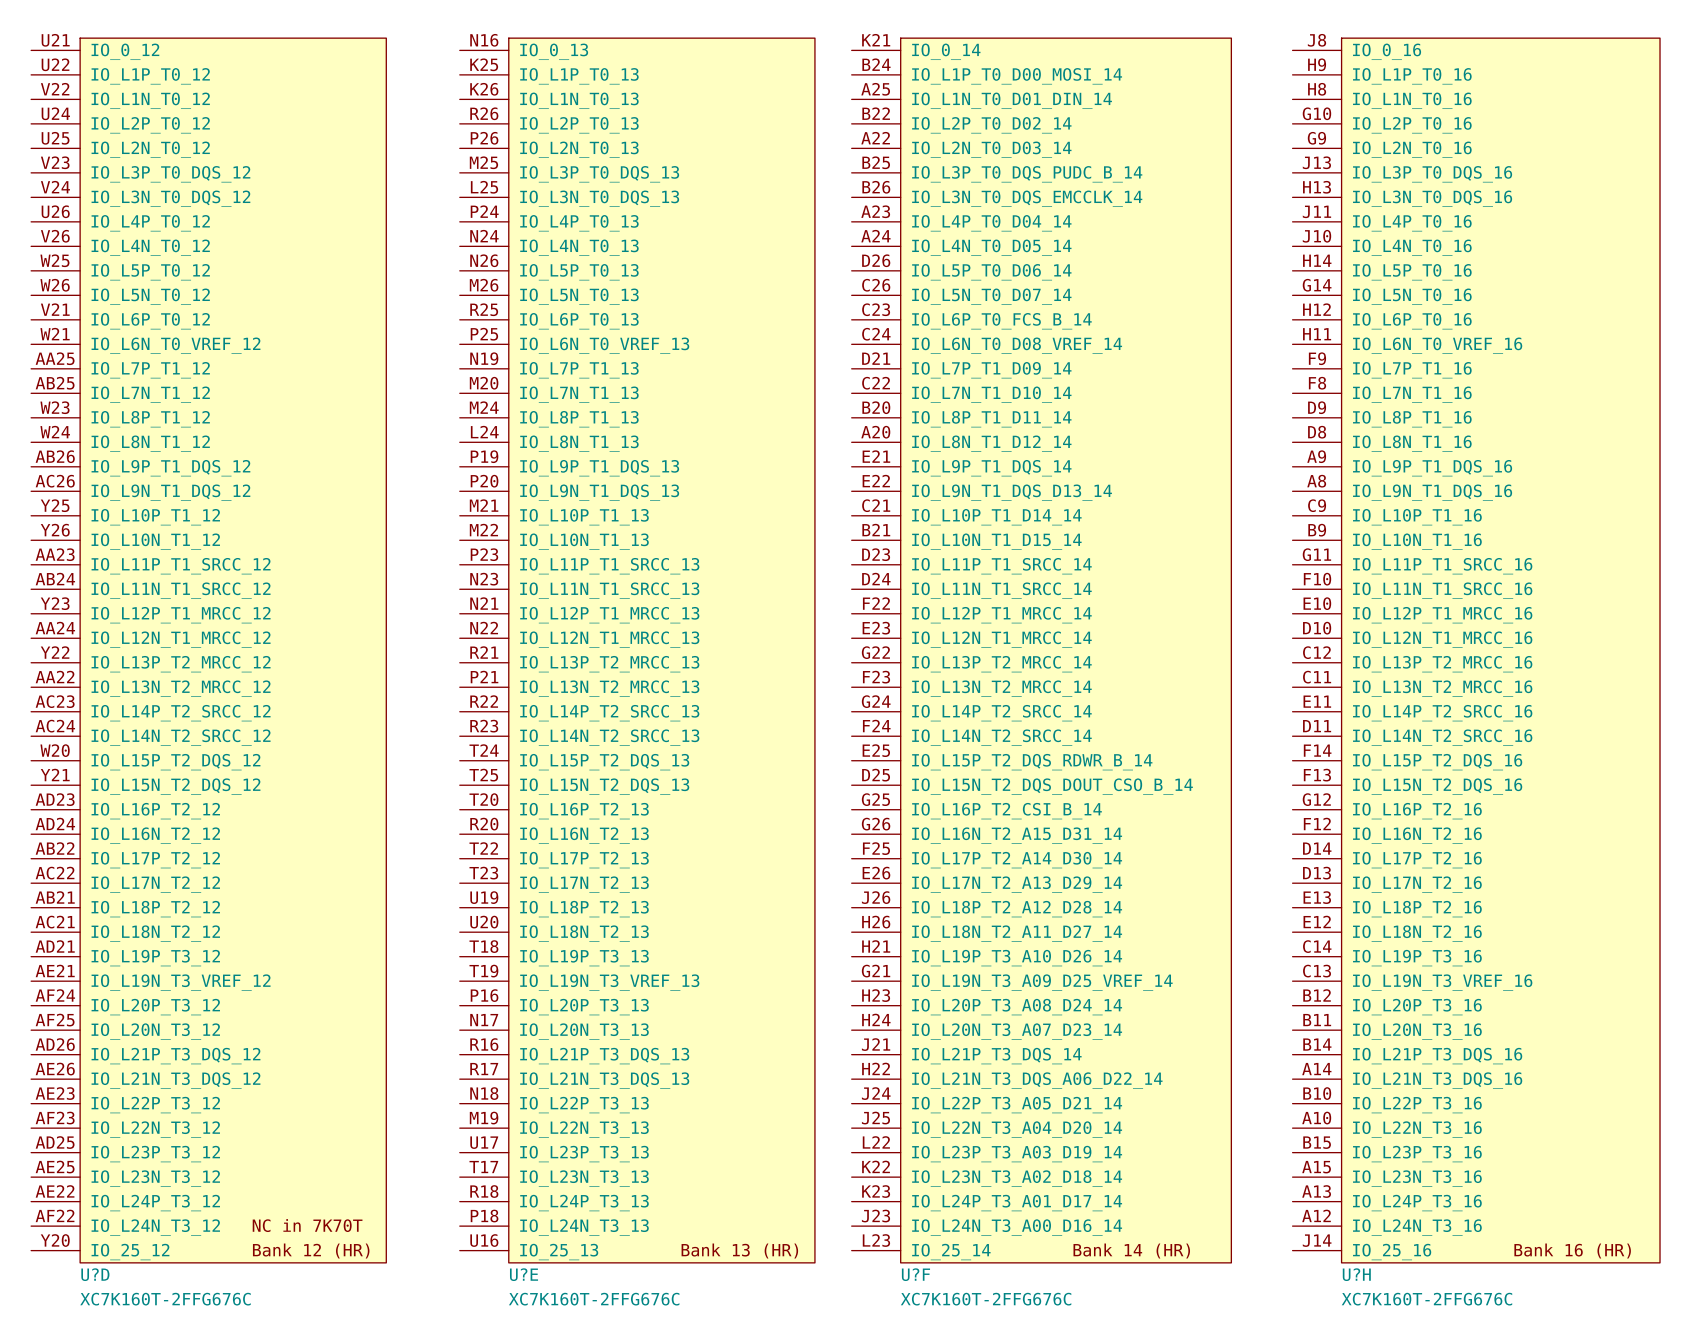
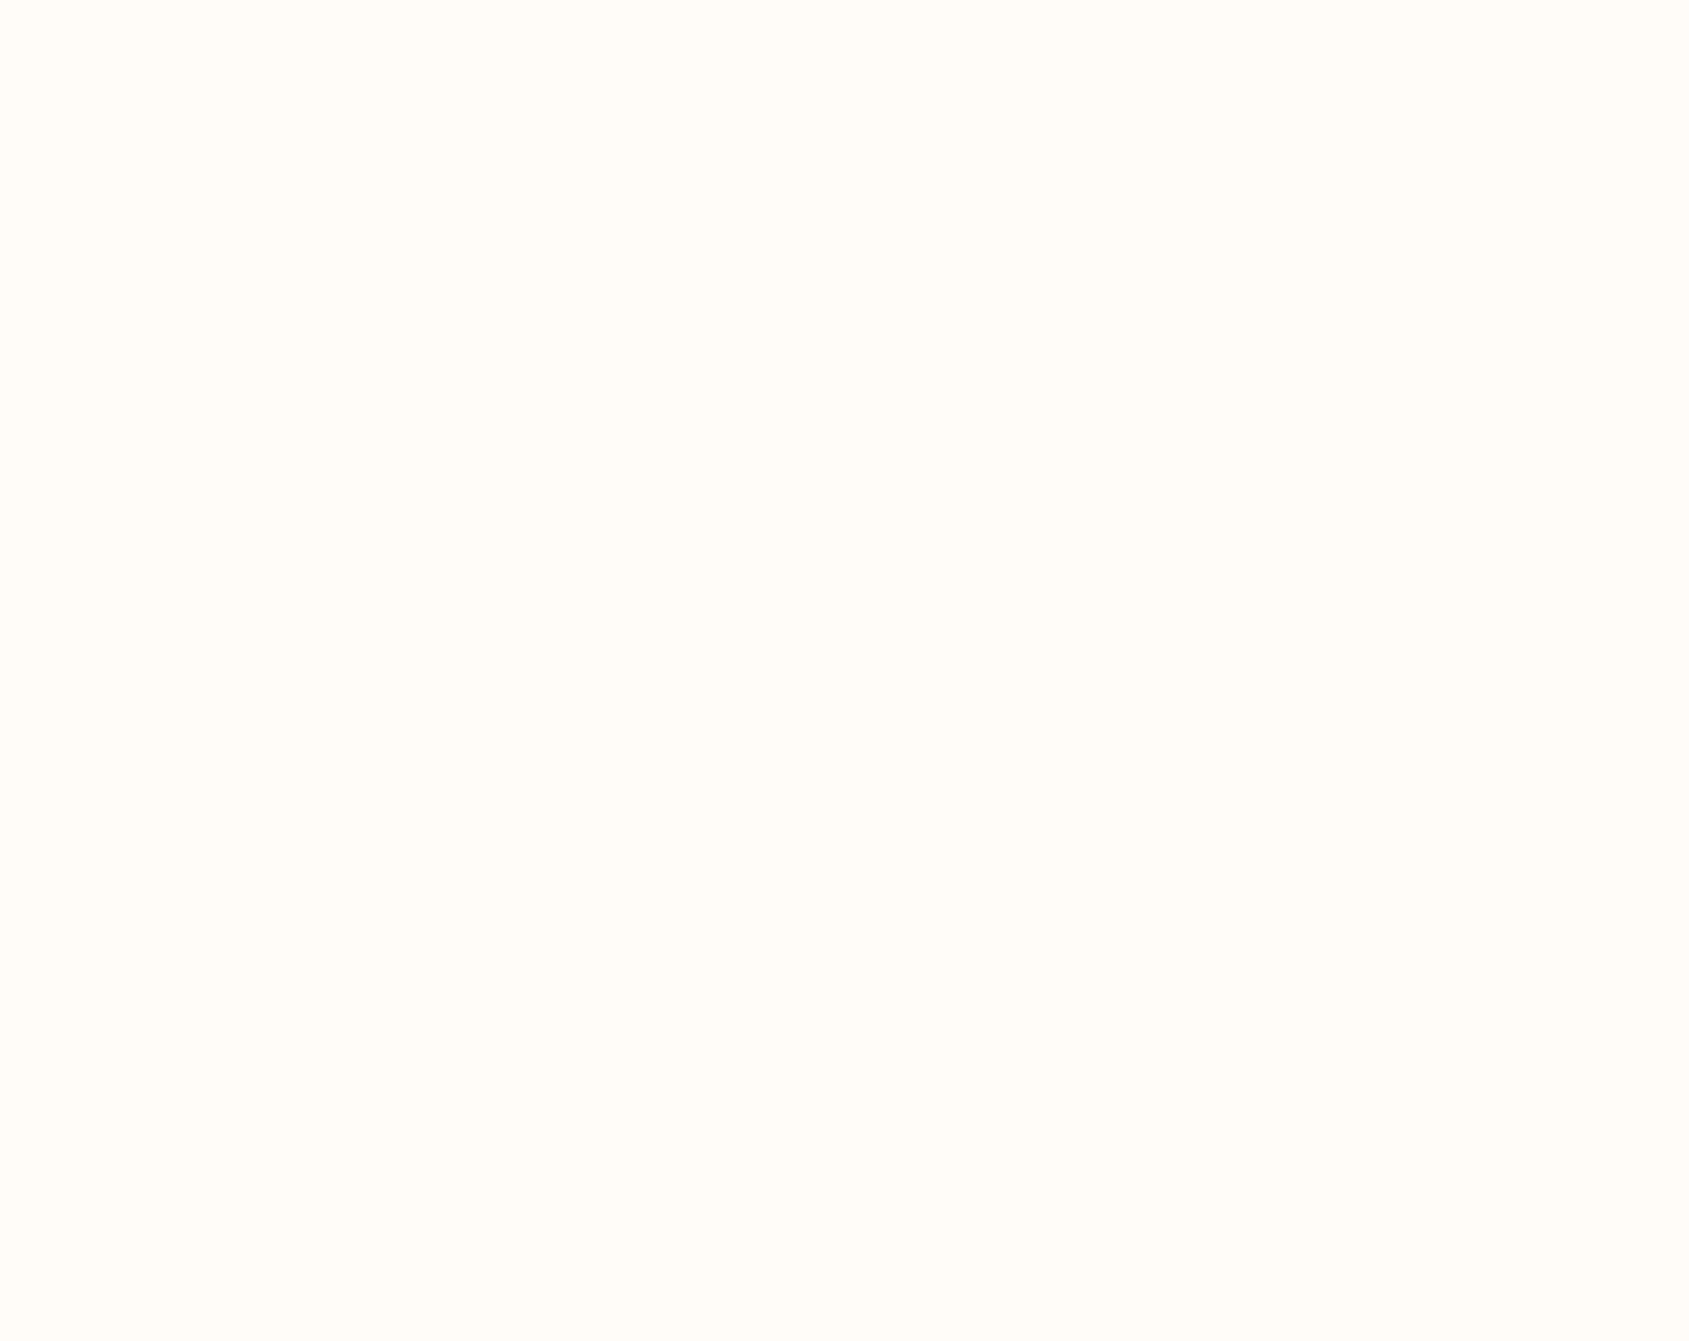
U?D: XC7K160T-2FFG676C (208, 650) -> none
U?E: XC7K160T-2FFG676C (637, 650) -> none
U?F: XC7K160T-2FFG676C (1041, 650) -> none
U?H: XC7K160T-2FFG676C (1476, 650) -> none

